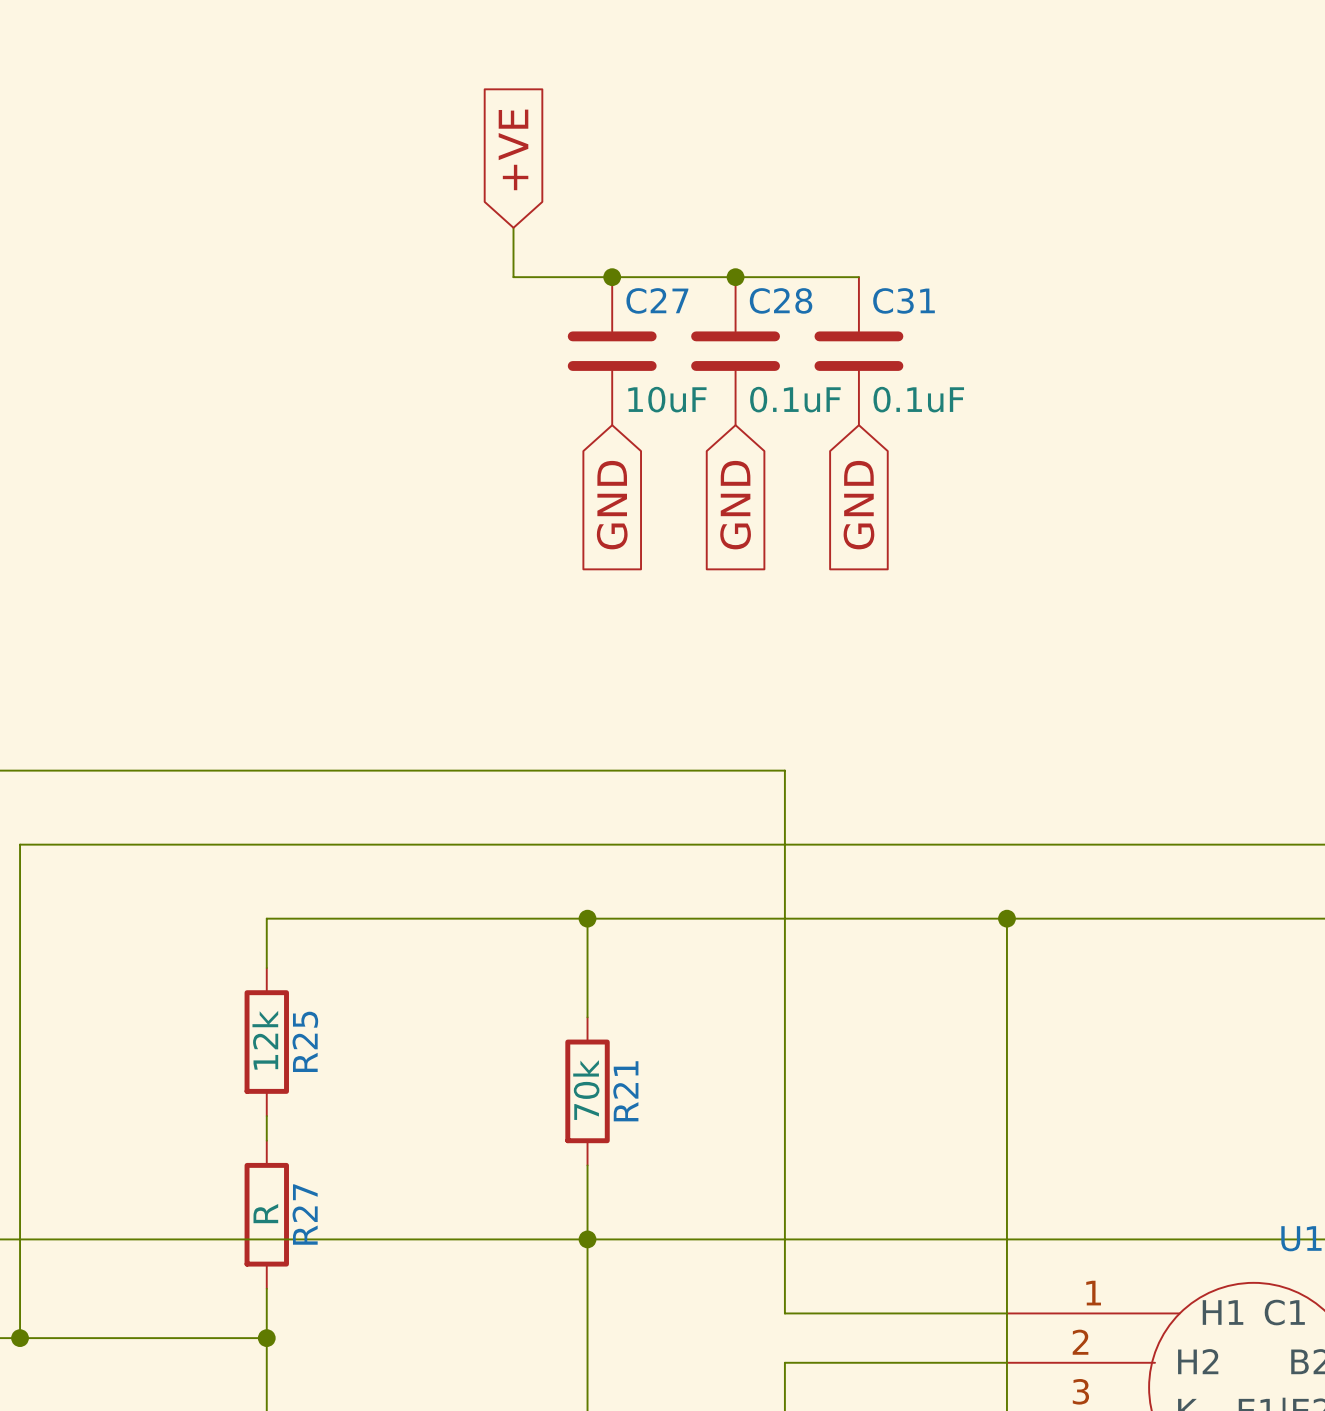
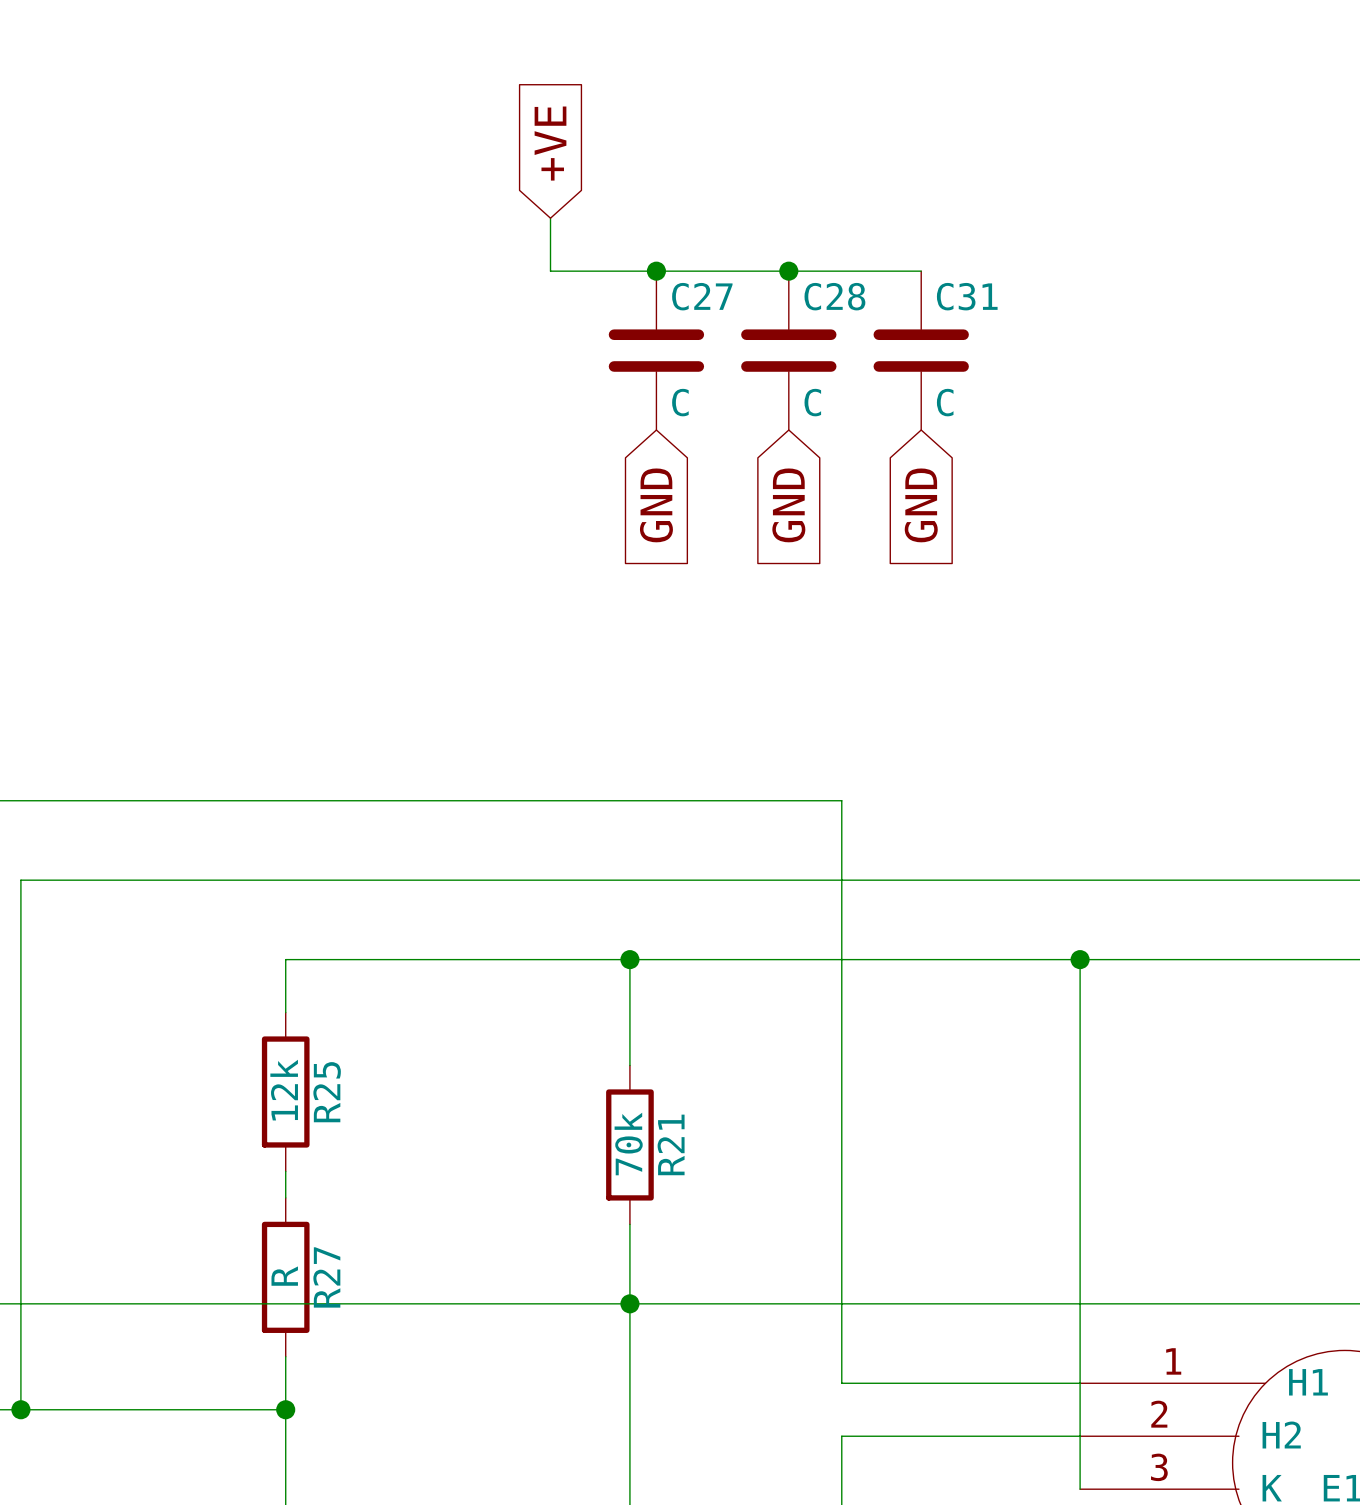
C27 value: 10uF (667, 399) -> C (680, 402)
C28 value: 0.1uF (795, 399) -> C (812, 402)
C31 value: 0.1uF (918, 399) -> C (945, 402)

